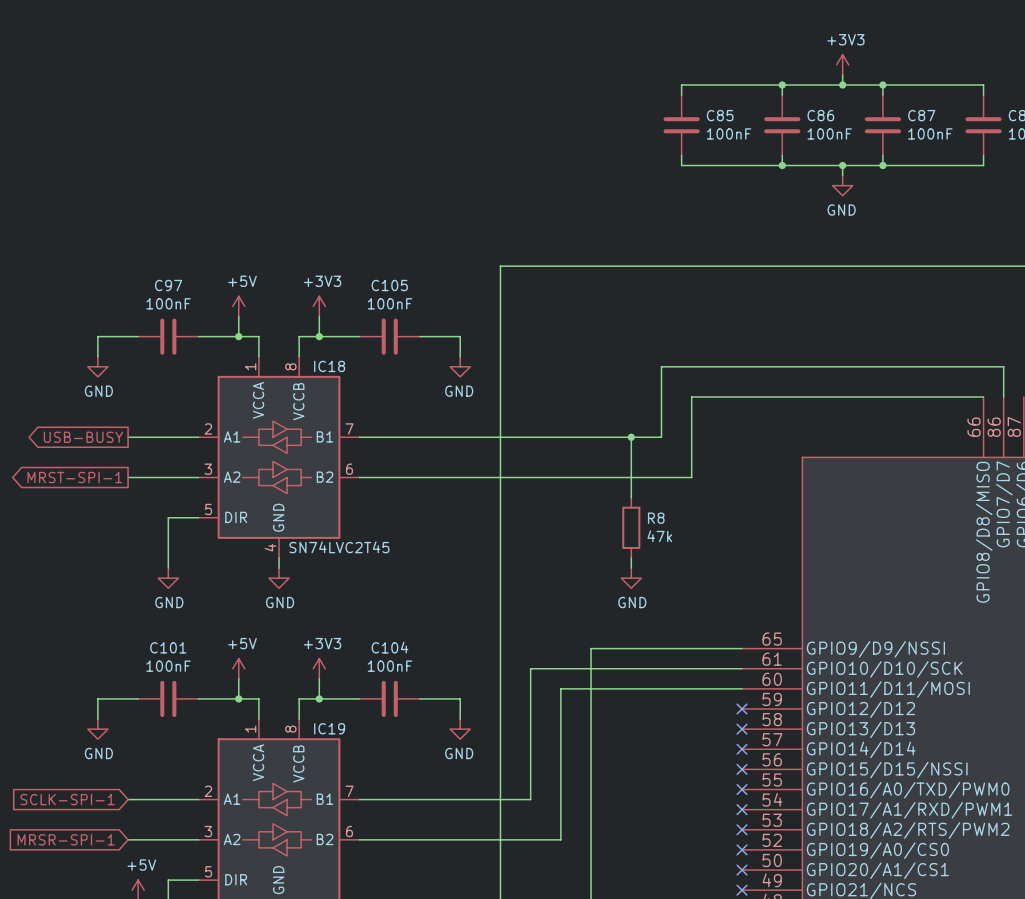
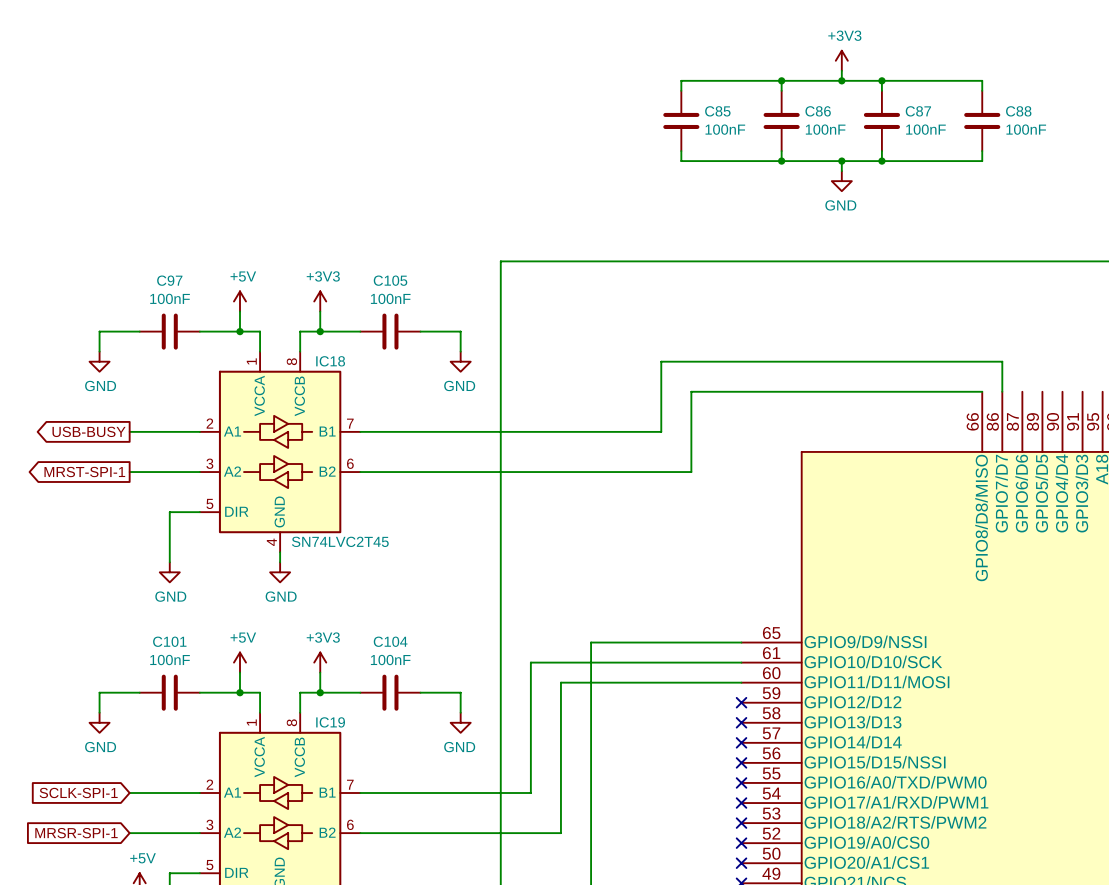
wire: (631, 437) (631, 497) -> none
junction: (631, 437) -> none
R8: 47k (631, 527) -> none
wire: (631, 558) (631, 568) -> none
power symbol: GND (631, 578) -> none

